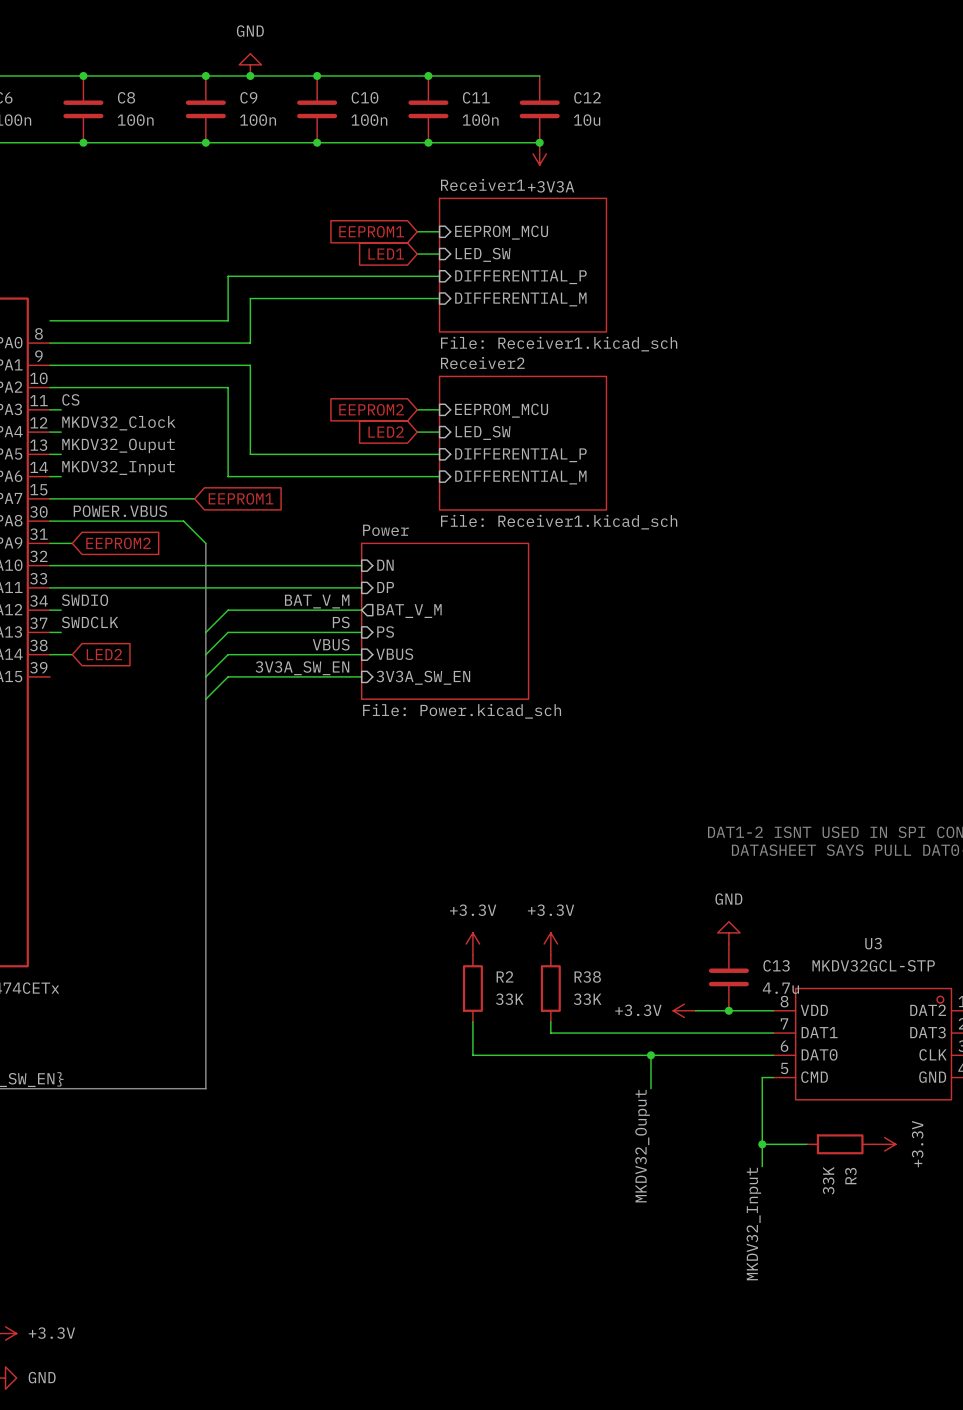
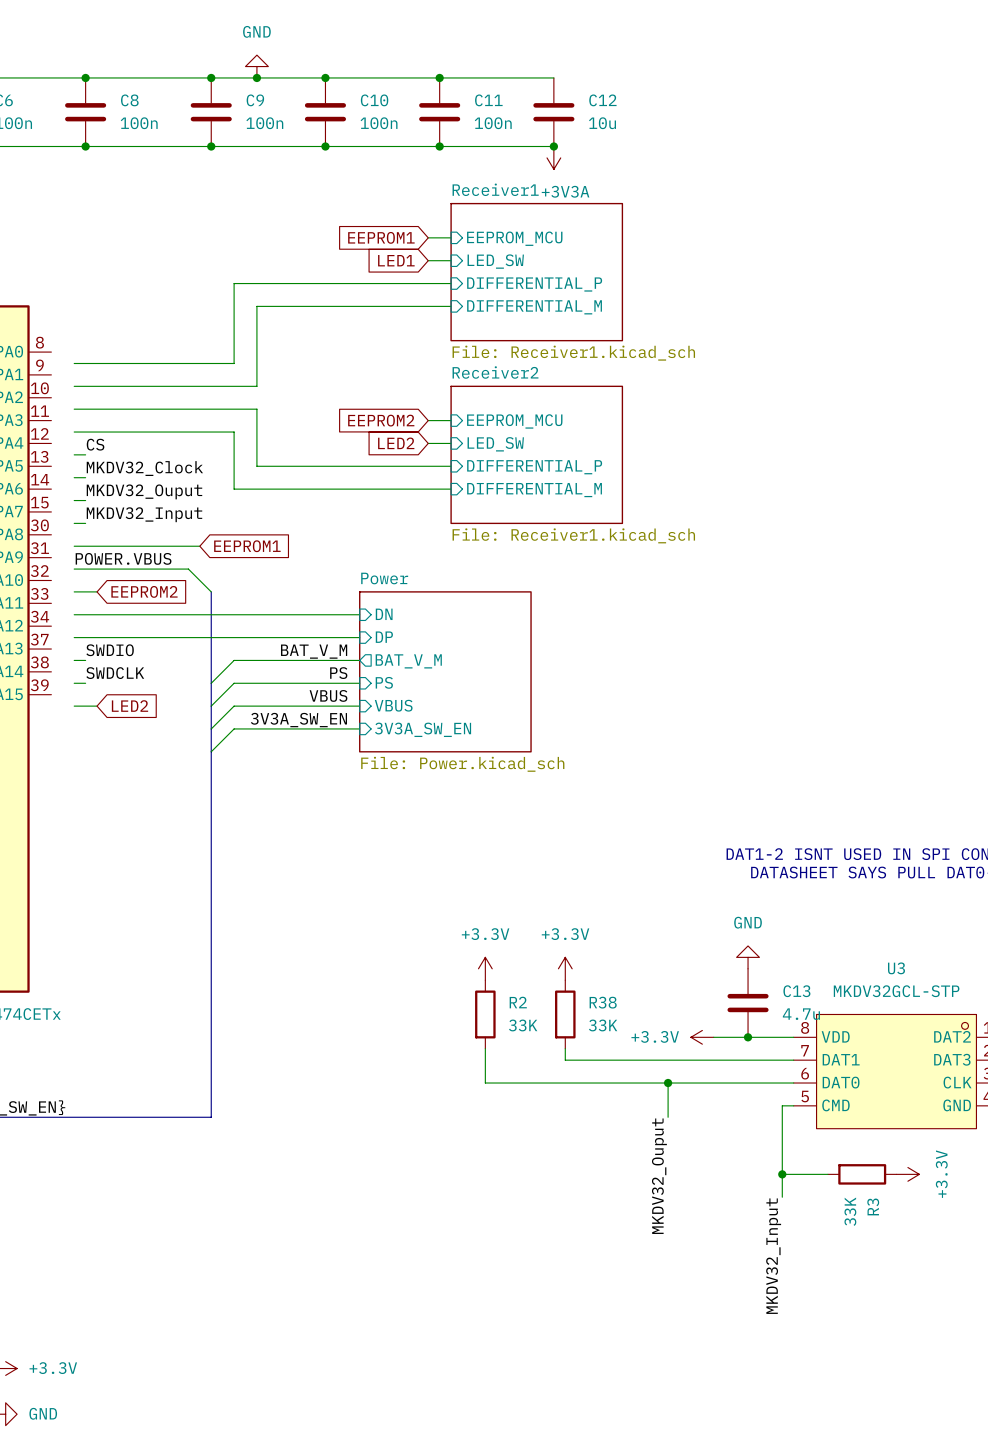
wire: (50, 320) (228, 320) -> (74, 363) (234, 363) (234, 329)
wire: (50, 343) (250, 343) -> (256, 374) (256, 352)
wire: (50, 365) (250, 365) -> none
wire: (250, 376) (250, 398) -> (256, 386) (74, 386)
wire: (50, 387) (228, 387) (228, 420) -> (74, 432) (234, 432)
wire: none -> (74, 409) (256, 409)
label position: CS (70, 399) -> CS (95, 444)
wire: (50, 409) (61, 409) -> (74, 454) (85, 454)
label position: MKDV32_Clock (118, 423) -> MKDV32_Clock (144, 468)
wire: (50, 432) (61, 432) -> (74, 477) (85, 477)
label position: MKDV32_Ouput (118, 445) -> MKDV32_Ouput (144, 491)
wire: (50, 454) (61, 454) -> (74, 500) (85, 500)
label position: MKDV32_Input (118, 468) -> MKDV32_Input (144, 514)
wire: (50, 476) (61, 476) -> (74, 523) (85, 523)
wire: (50, 498) (194, 498) -> none
global label position: EEPROM1 (241, 498) -> EEPROM1 (247, 546)
label position: POWER.VBUS (120, 511) -> POWER.VBUS (123, 558)
wire: (50, 521) (183, 521) (205, 543) -> none
wire: none -> (74, 546) (199, 546)
wire: (50, 543) (72, 543) -> (74, 591) (97, 591)
global label position: EEPROM2 (118, 543) -> EEPROM2 (144, 591)
bus: (205, 543) (205, 576) -> none
wire: none -> (74, 569) (188, 569) (211, 591)
wire: (50, 565) (361, 565) -> none
sheet pin position: DN (385, 565) -> DN (384, 614)
wire: (50, 587) (361, 587) -> none
sheet pin position: DP (385, 587) -> DP (384, 637)
wire: none -> (74, 614) (359, 614)
label position: SWDIO (85, 600) -> SWDIO (110, 650)
label position: BAT_V_M (317, 601) -> BAT_V_M (314, 651)
wire: (50, 610) (61, 610) -> (74, 660) (85, 660)
wire: (361, 610) (228, 610) (205, 632) -> none
sheet pin position: BAT_V_M (409, 611) -> BAT_V_M (408, 661)
wire: none -> (74, 637) (359, 637)
sheet Power position: (445, 621) -> (445, 671)
label position: SWDCLK (90, 622) -> SWDCLK (115, 673)
label position: PS (341, 622) -> PS (338, 673)
sheet pin position: PS (385, 631) -> PS (384, 682)
wire: (50, 632) (61, 632) -> (74, 683) (85, 683)
wire: (361, 632) (228, 632) (205, 654) -> none
wire: none -> (359, 660) (234, 660) (211, 683)
label position: VBUS (331, 644) -> VBUS (328, 695)
wire: (50, 654) (72, 654) -> (74, 706) (97, 706)
global label position: LED2 (104, 654) -> LED2 (129, 706)
wire: (361, 654) (228, 654) (205, 676) -> none
sheet pin position: VBUS (394, 654) -> VBUS (393, 705)
wire: none -> (359, 683) (234, 683) (211, 706)
label position: 3V3A_SW_EN (302, 668) -> 3V3A_SW_EN (298, 720)
wire: (361, 676) (228, 676) (205, 699) -> none
sheet pin position: 3V3A_SW_EN (423, 677) -> 3V3A_SW_EN (423, 729)
wire: none -> (359, 706) (234, 706) (211, 728)
wire: none -> (359, 728) (234, 728) (211, 751)

